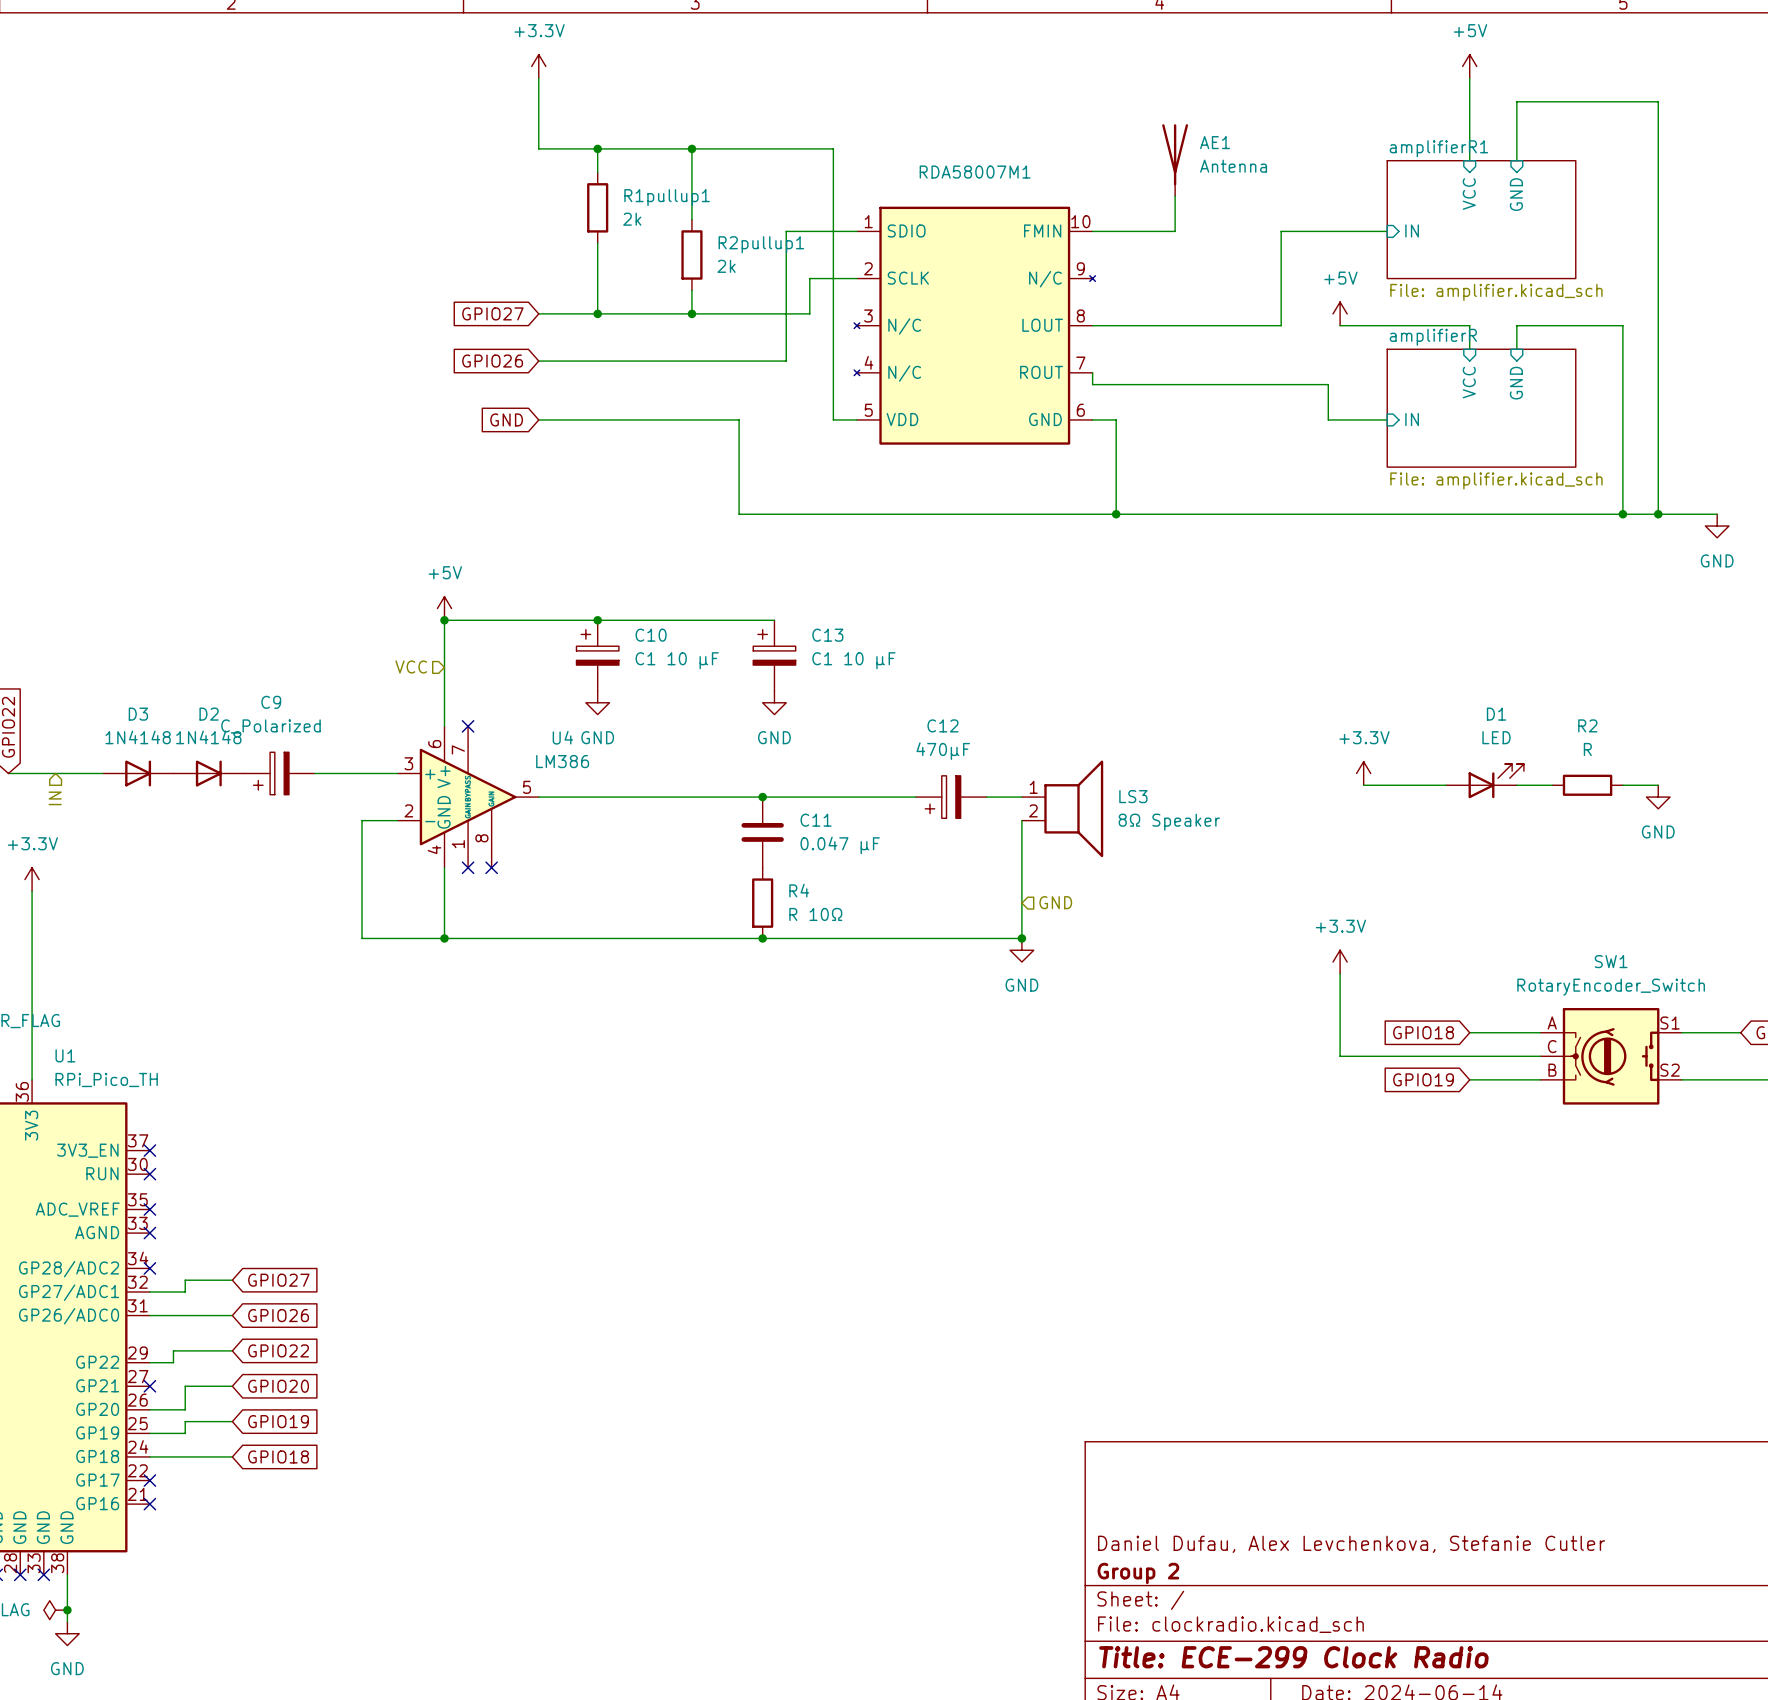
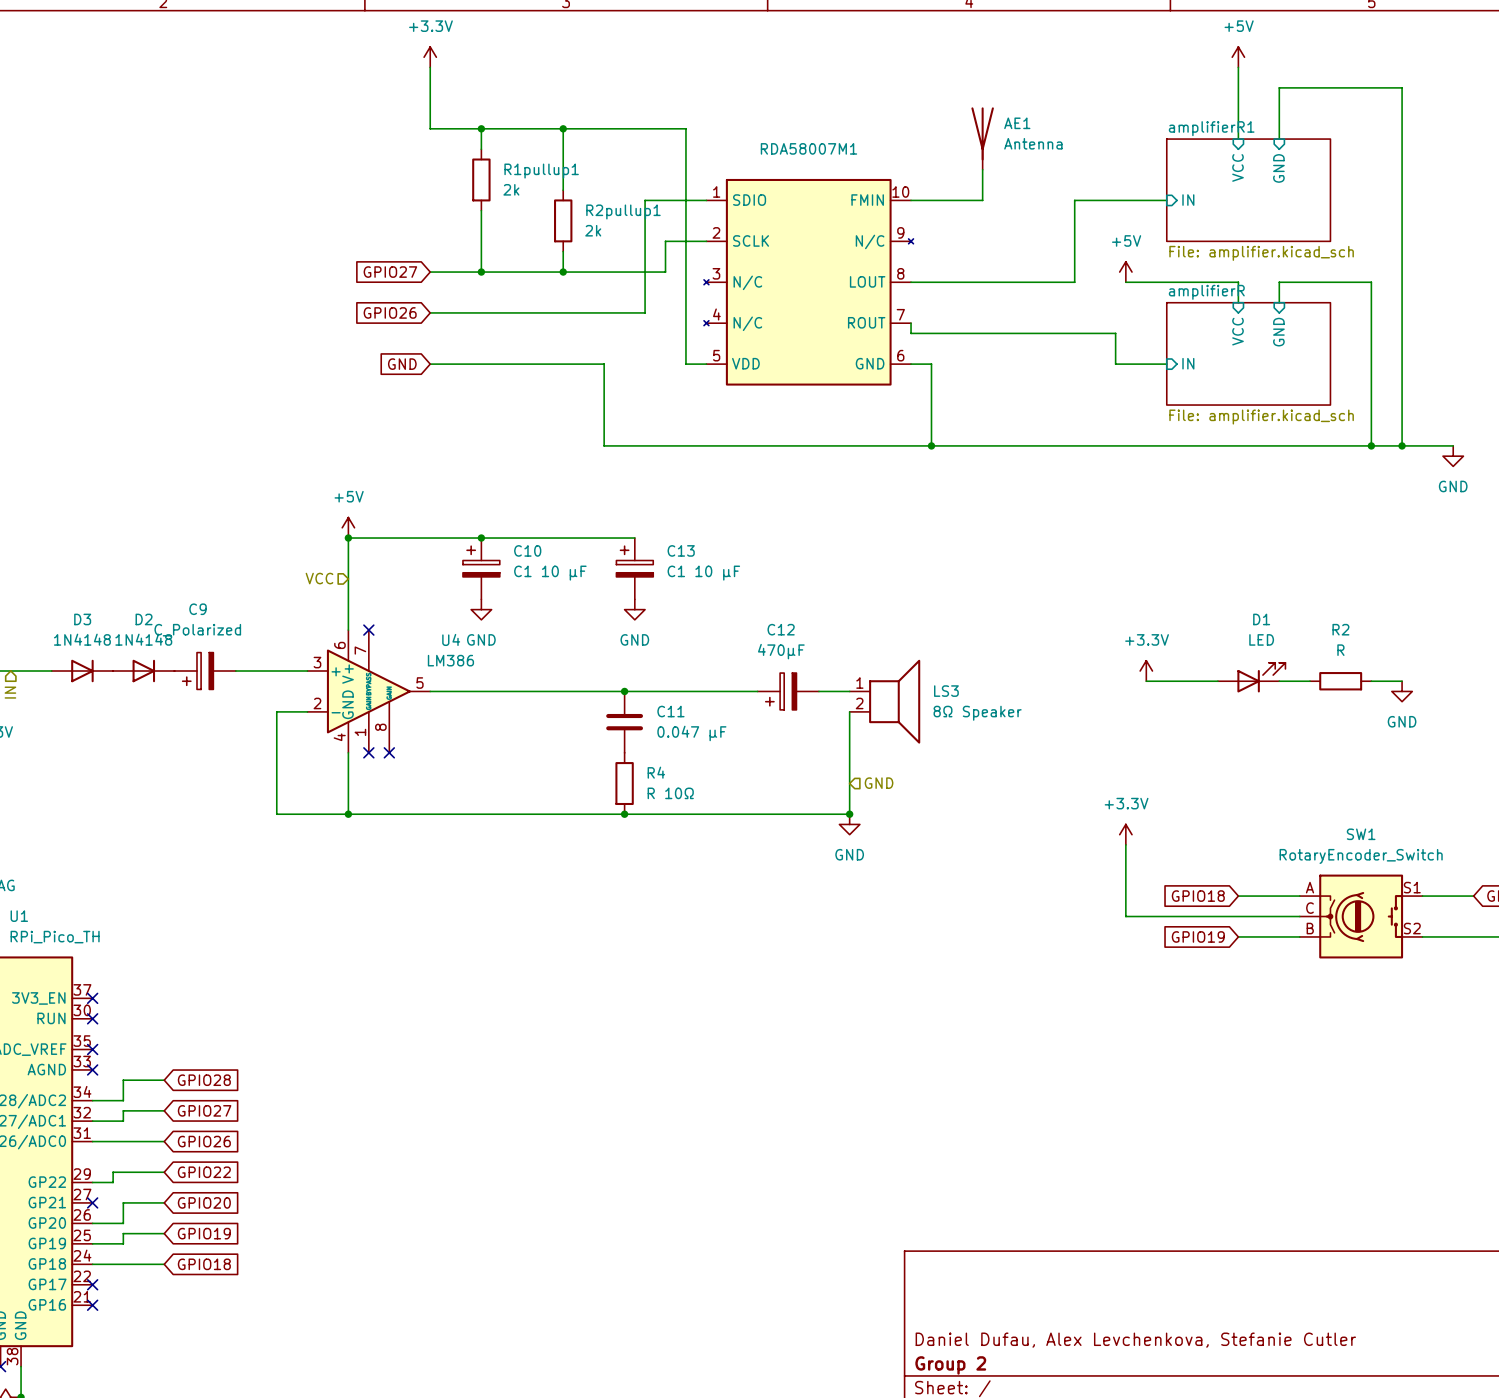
wire: none -> (164, 1080) (123, 1080) (123, 1100) (92, 1100)
global label: none -> GPIO28 (204, 1080)
no-connect mark: (149, 1268) -> none

